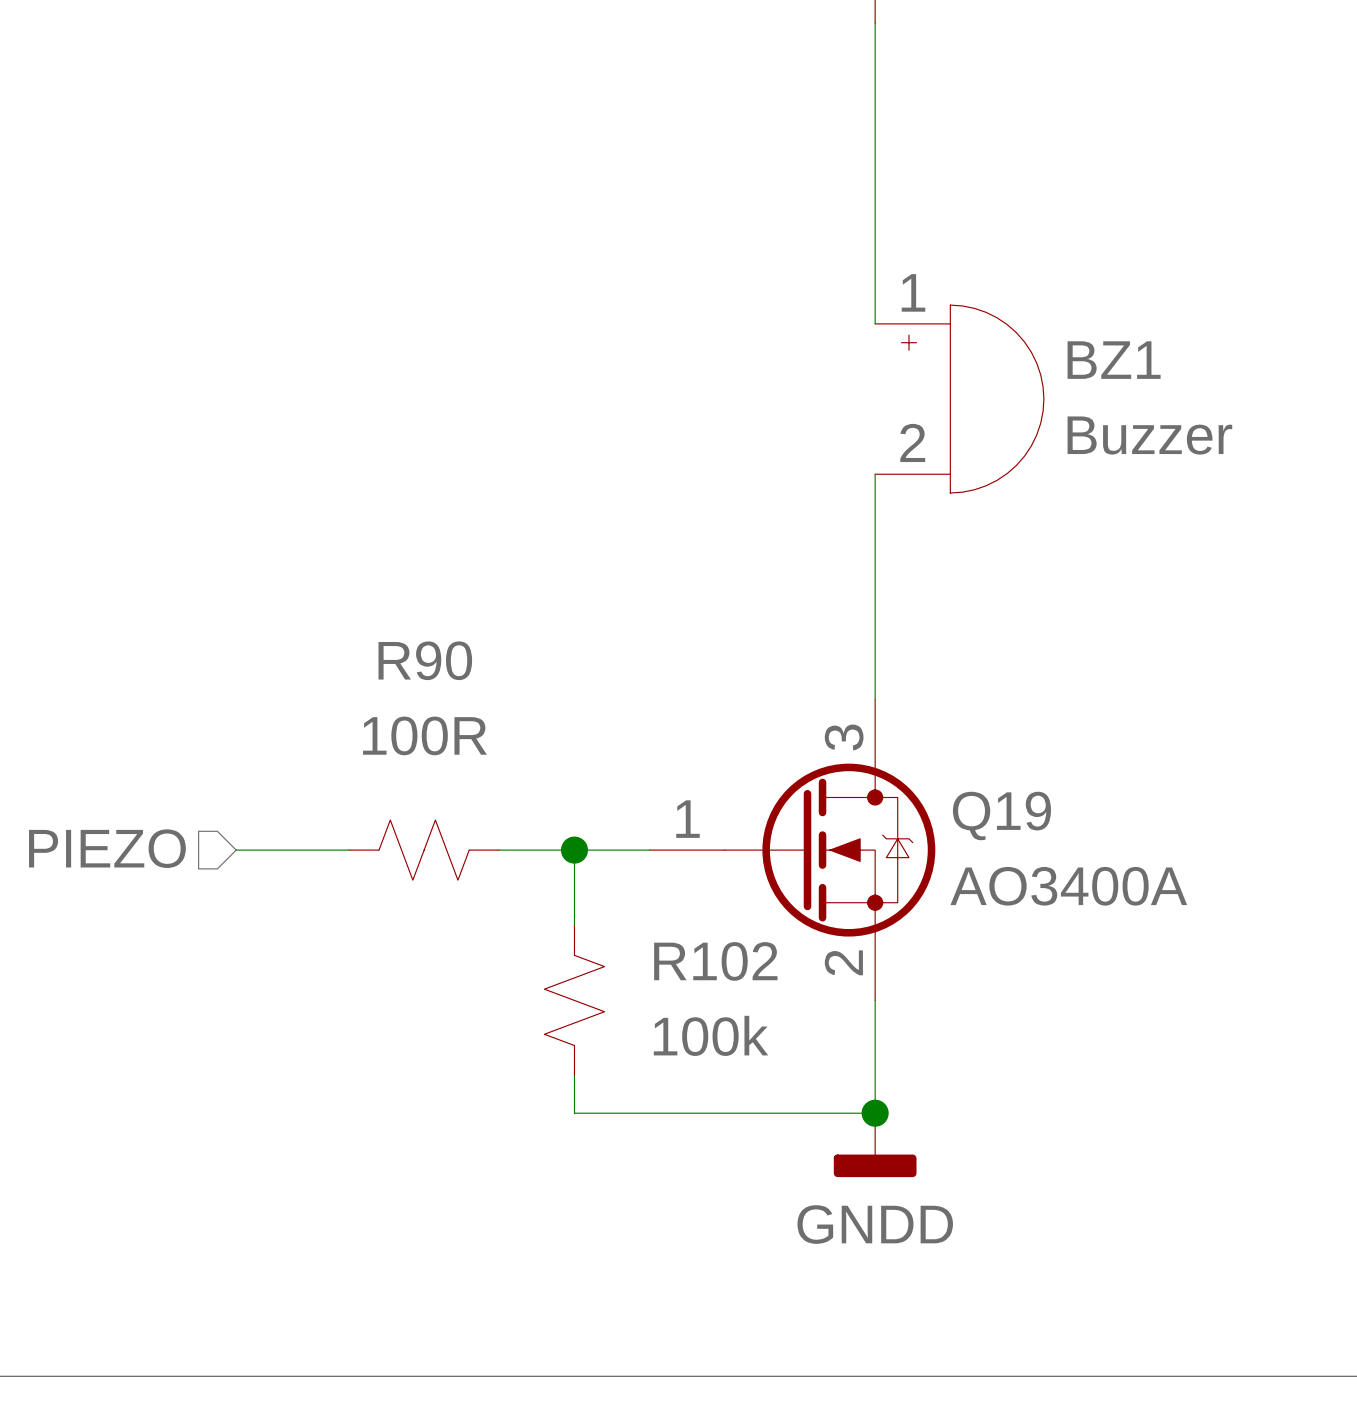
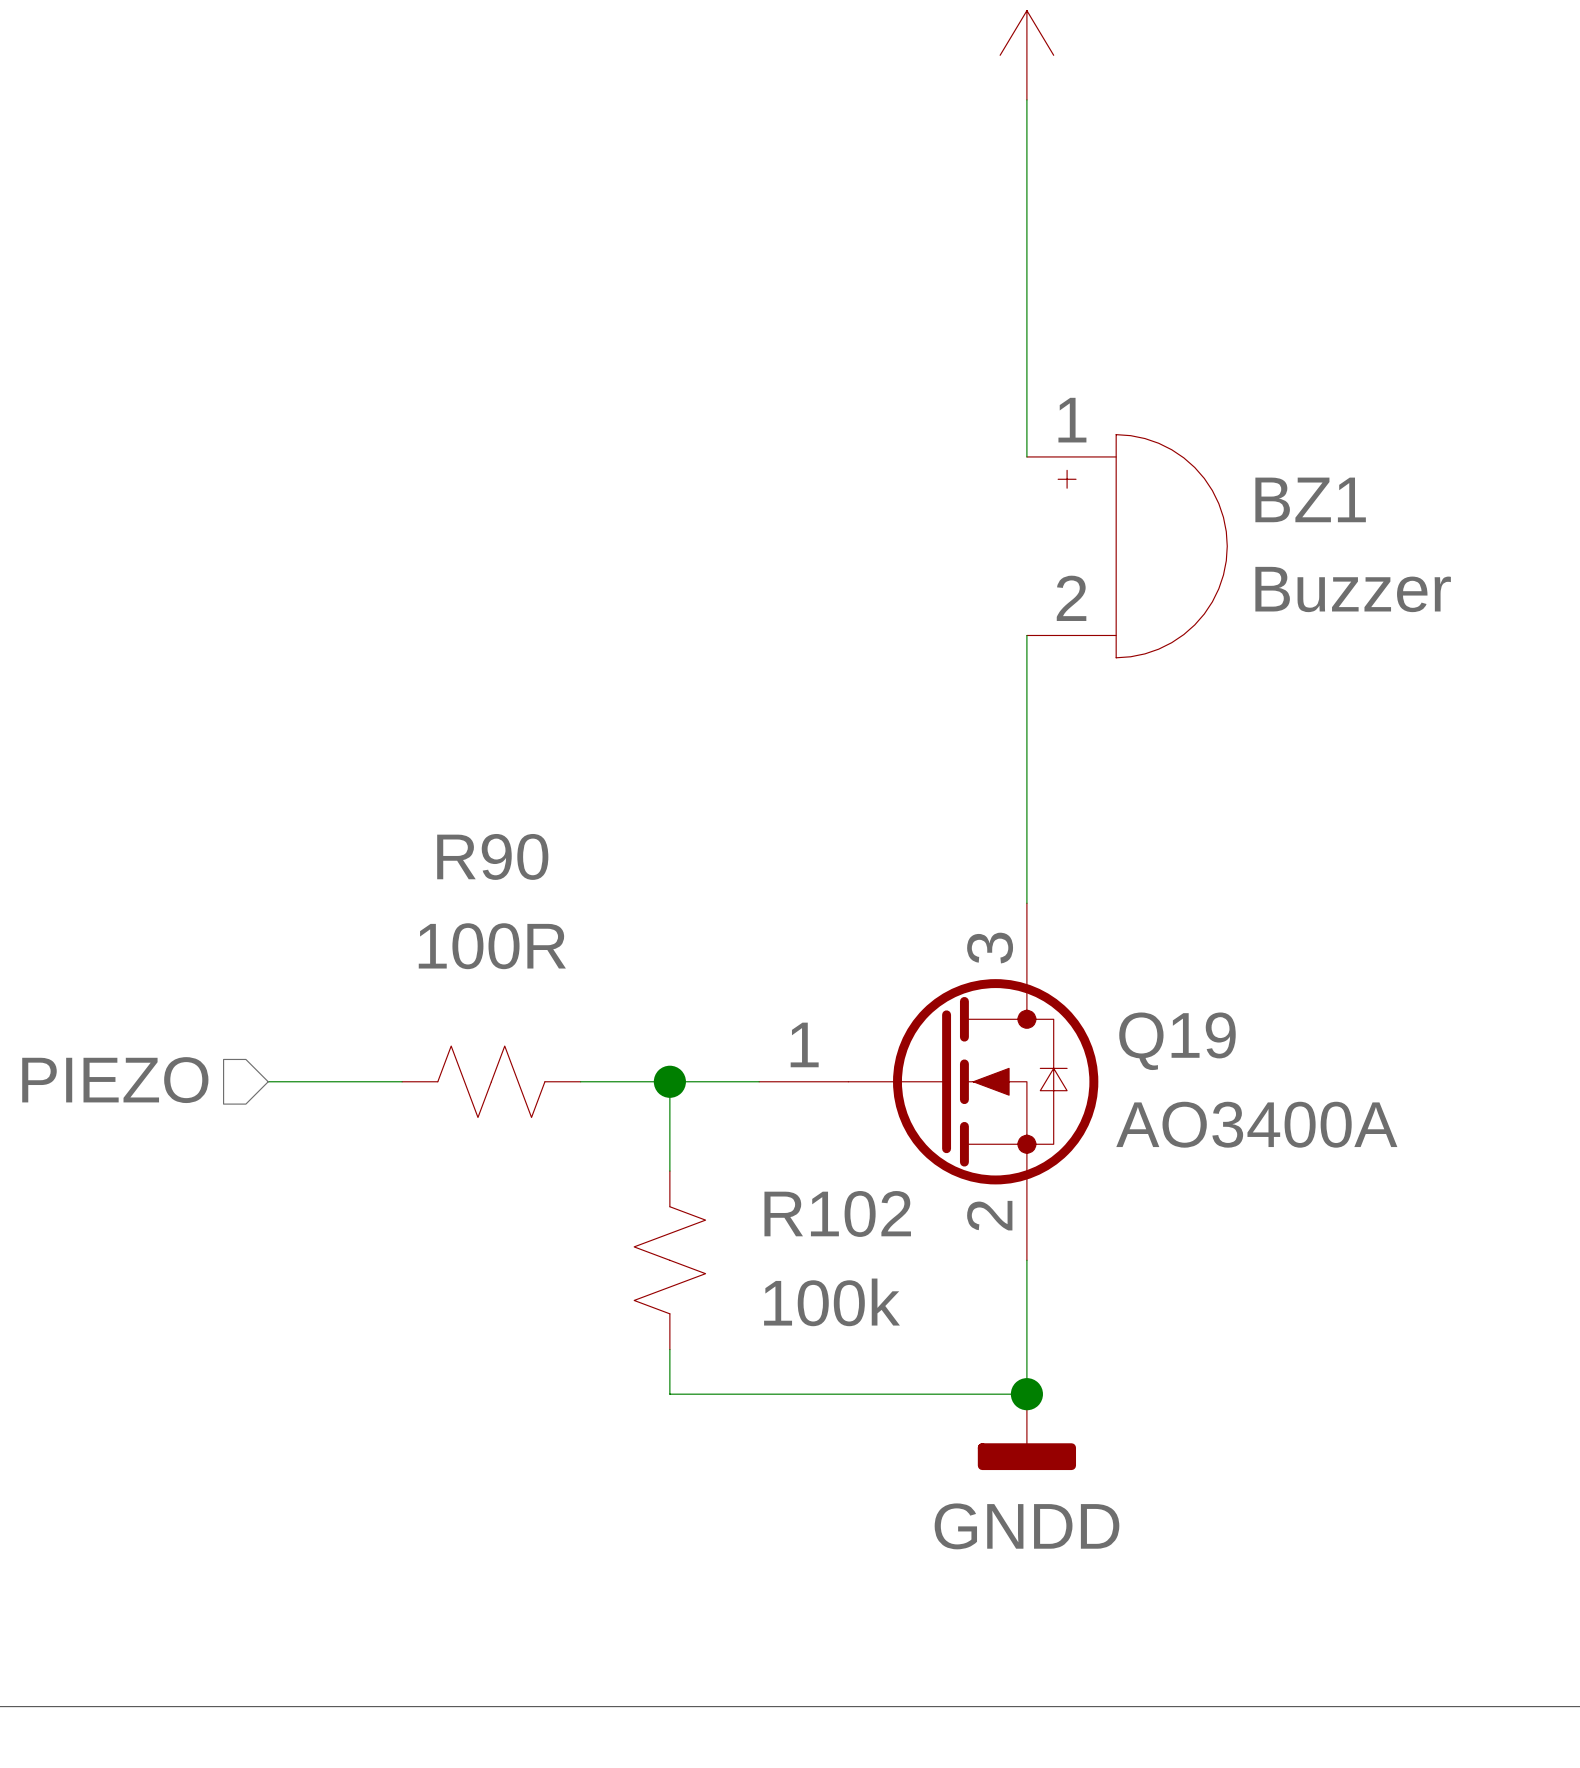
Q19 symbol: [649, 699, 936, 1001] -> [759, 903, 1099, 1261]

